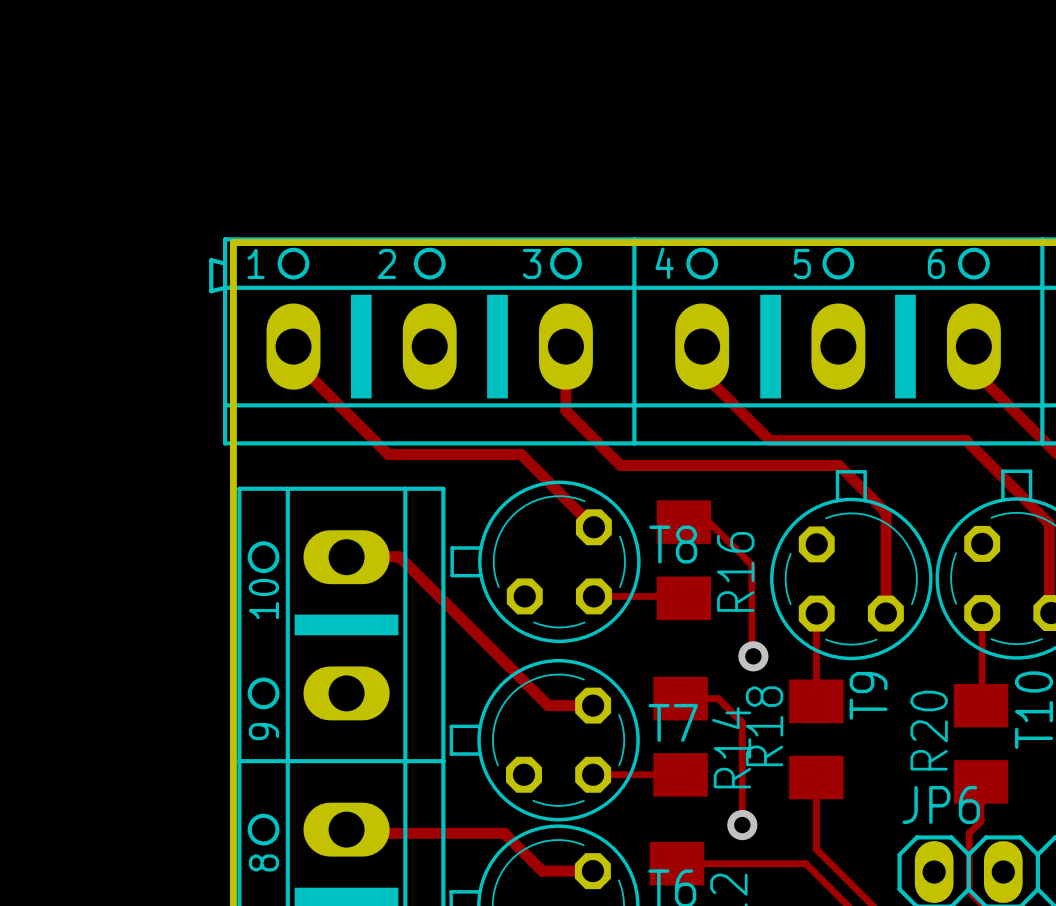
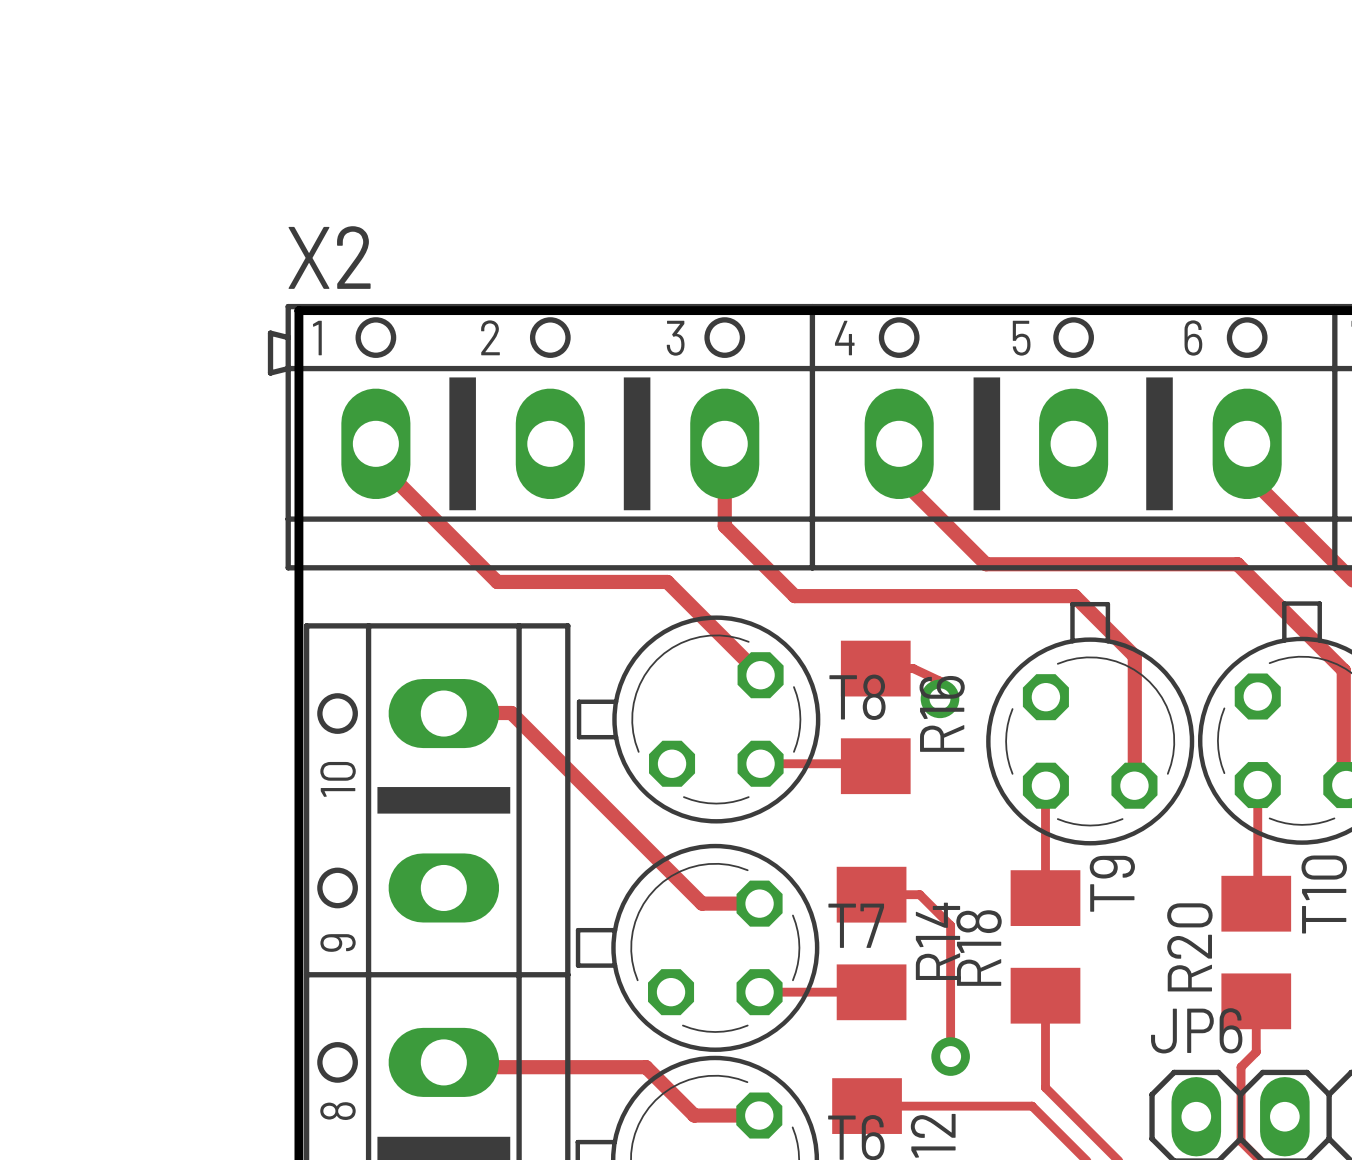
X2 name: none -> X2 (329, 257)
track: (709, 522) (752, 565) (753, 656) -> (907, 668) (913, 668) (939, 681) (939, 698)
via position: (753, 656) -> (939, 698)

